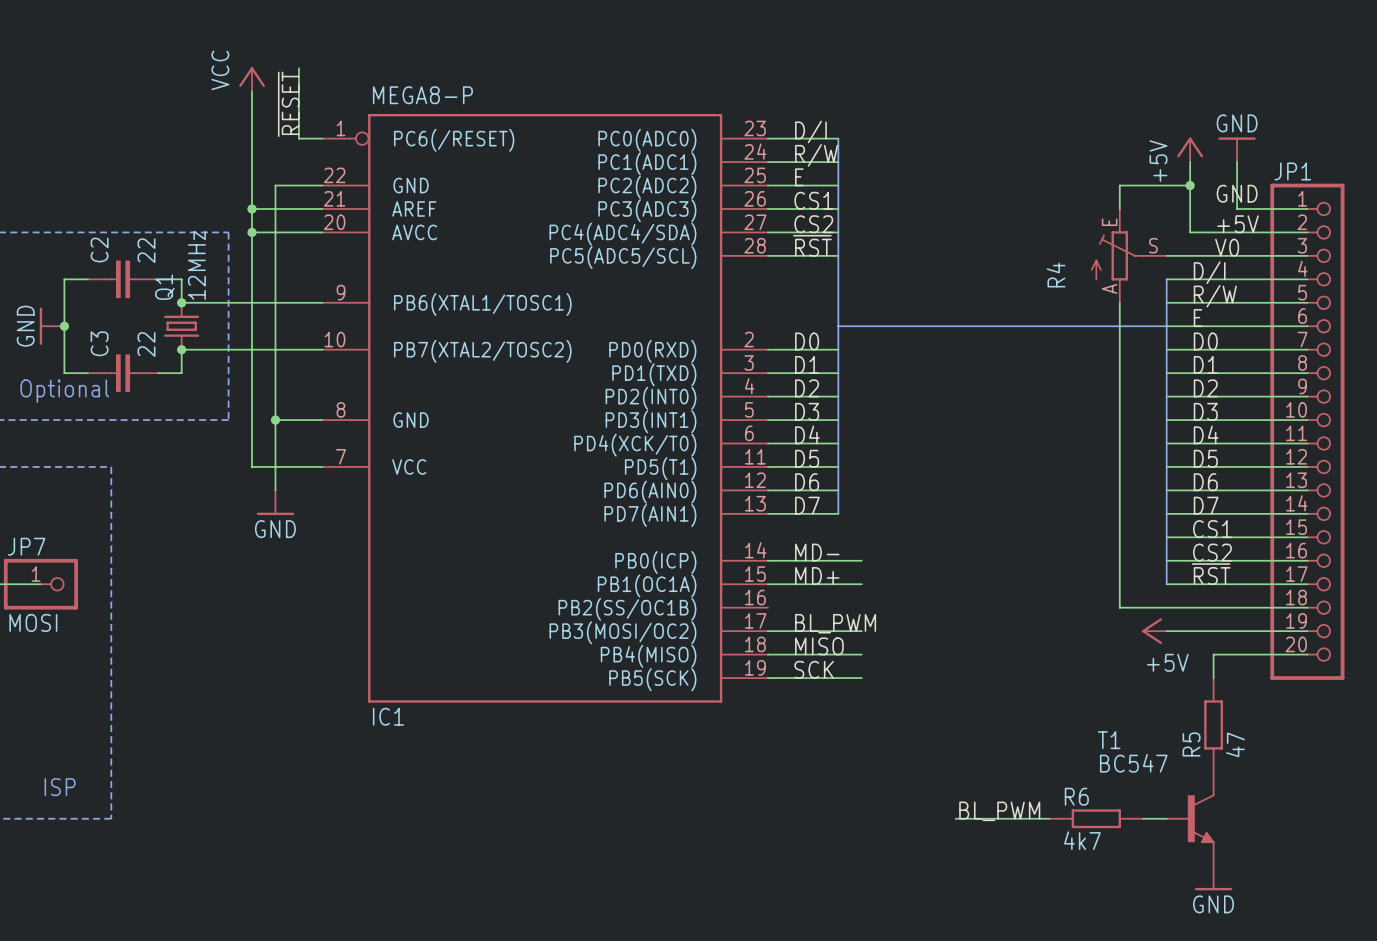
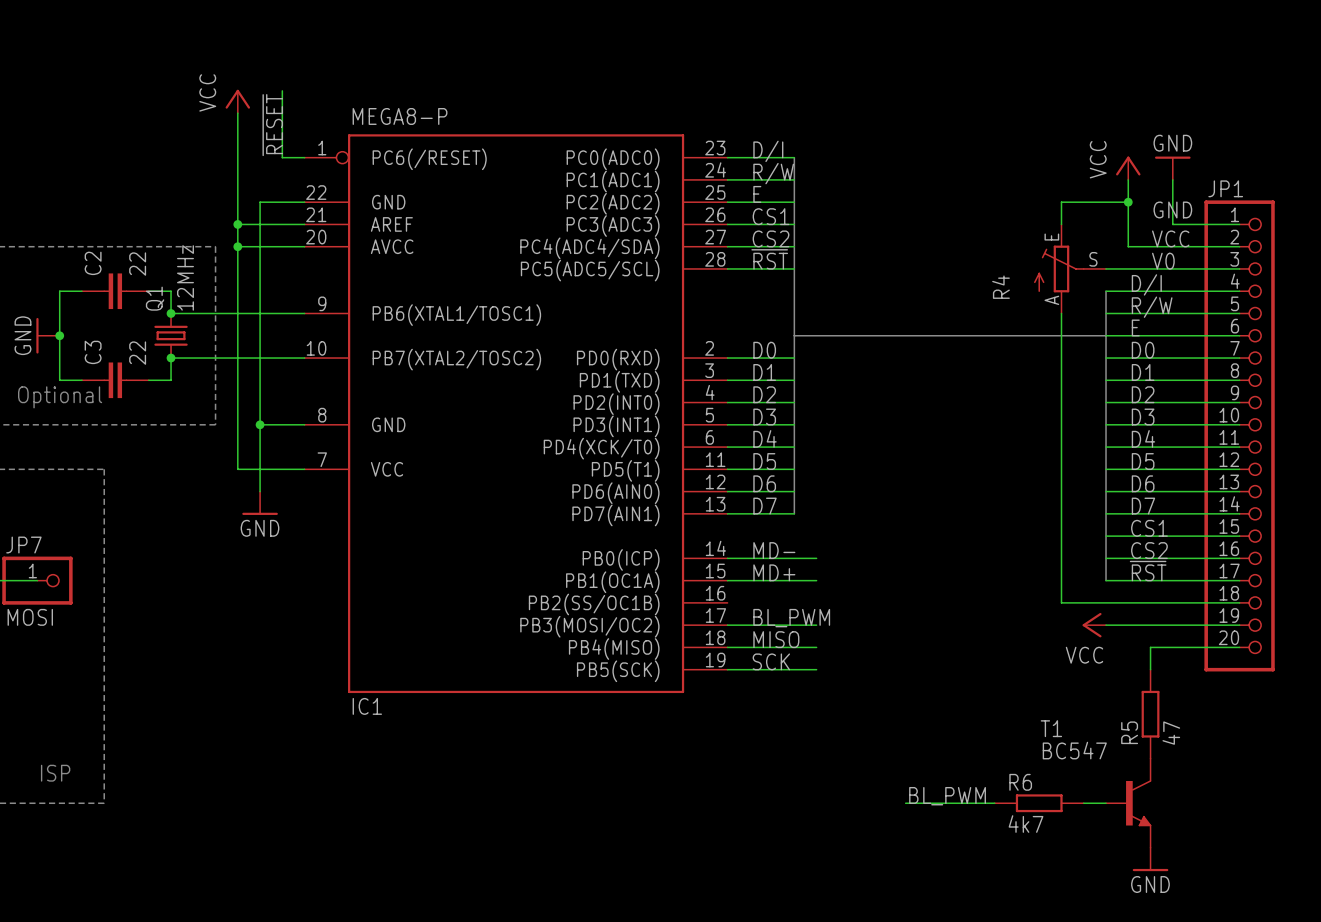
power symbol: +5V (1190, 149) -> VCC (1128, 168)
label: +5V (1238, 224) -> VCC (1170, 238)
power symbol: +5V (1154, 631) -> VCC (1094, 625)

